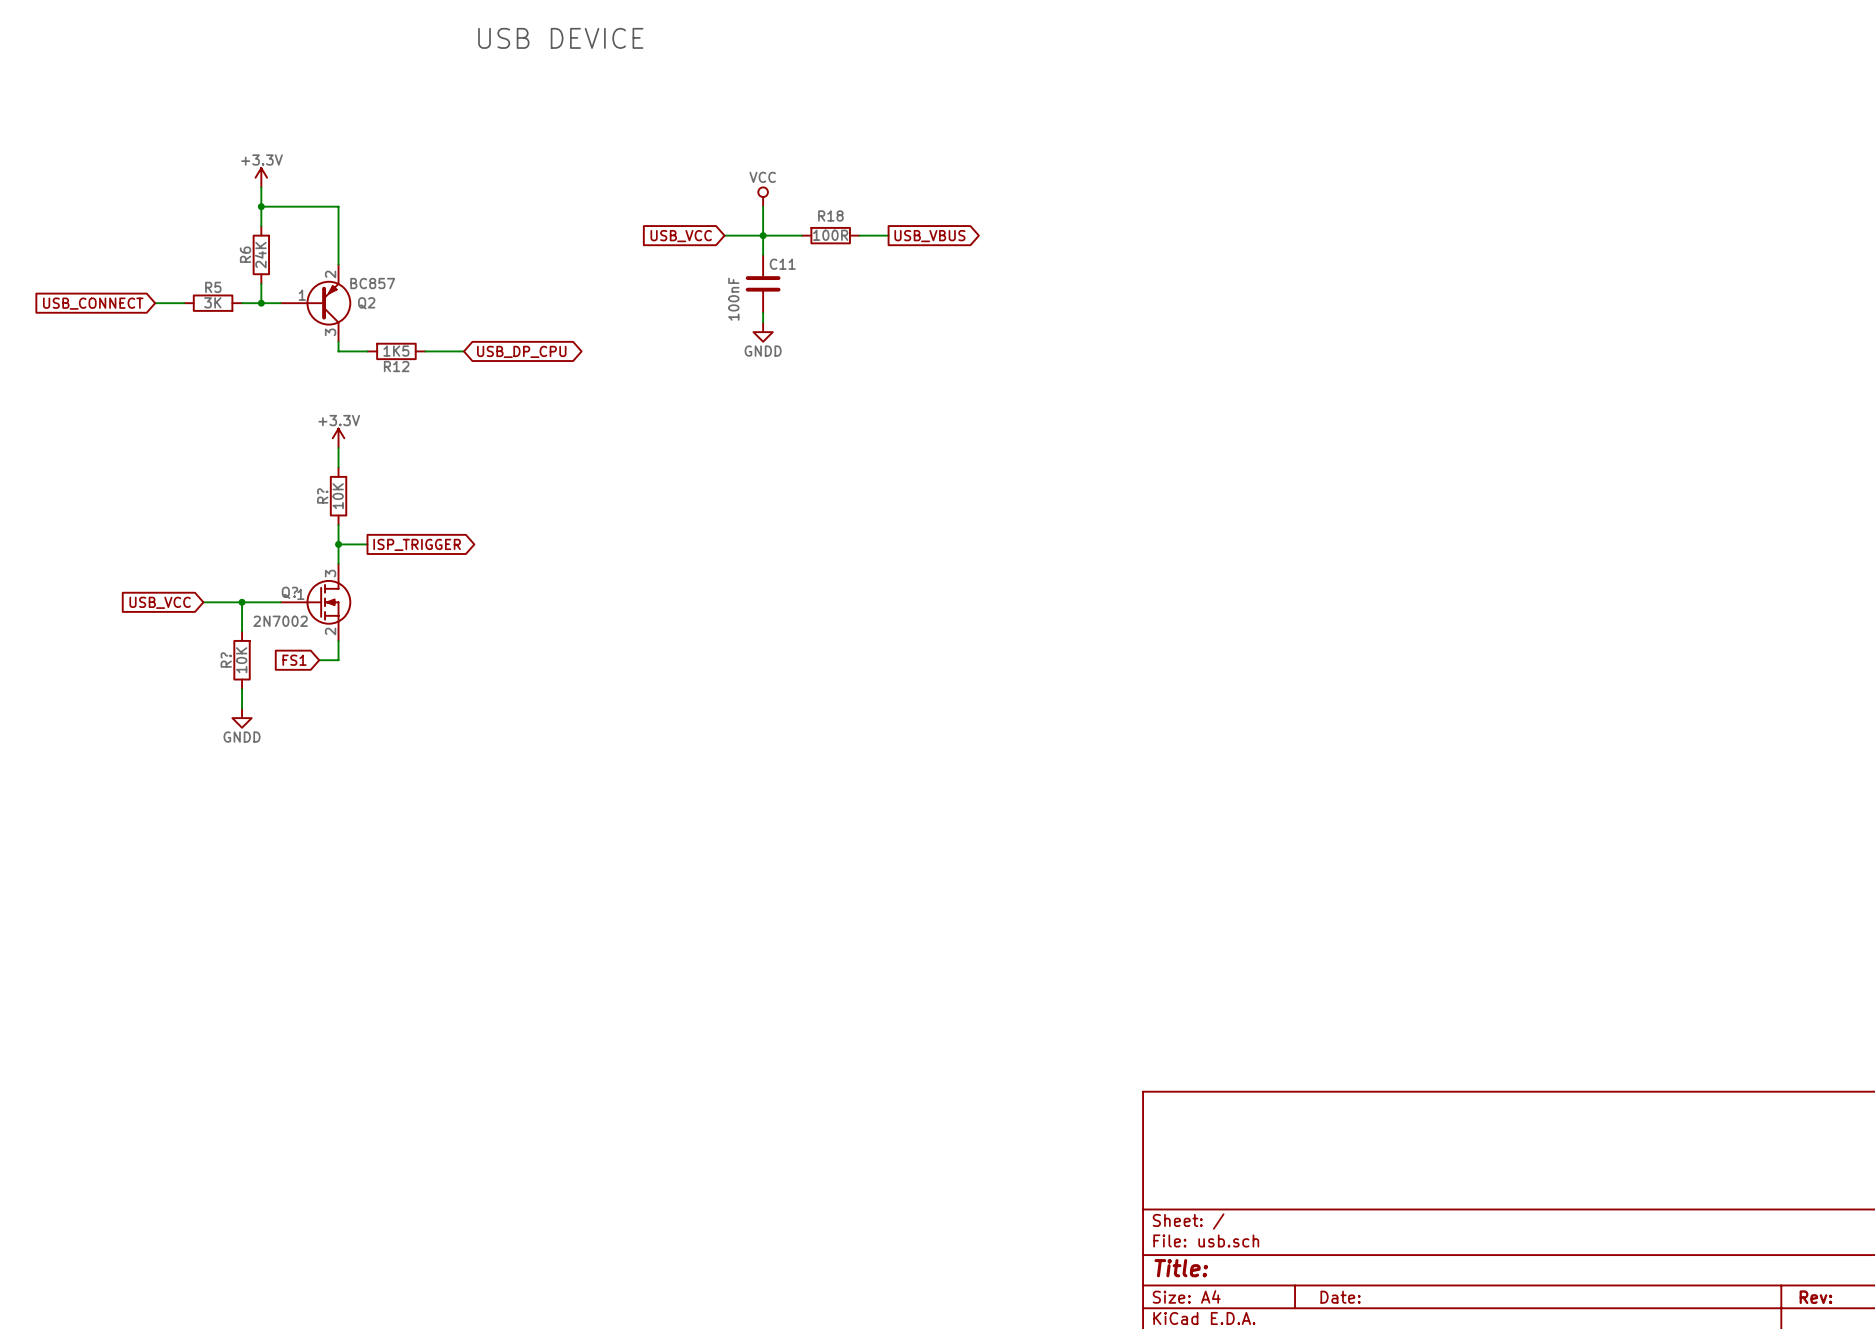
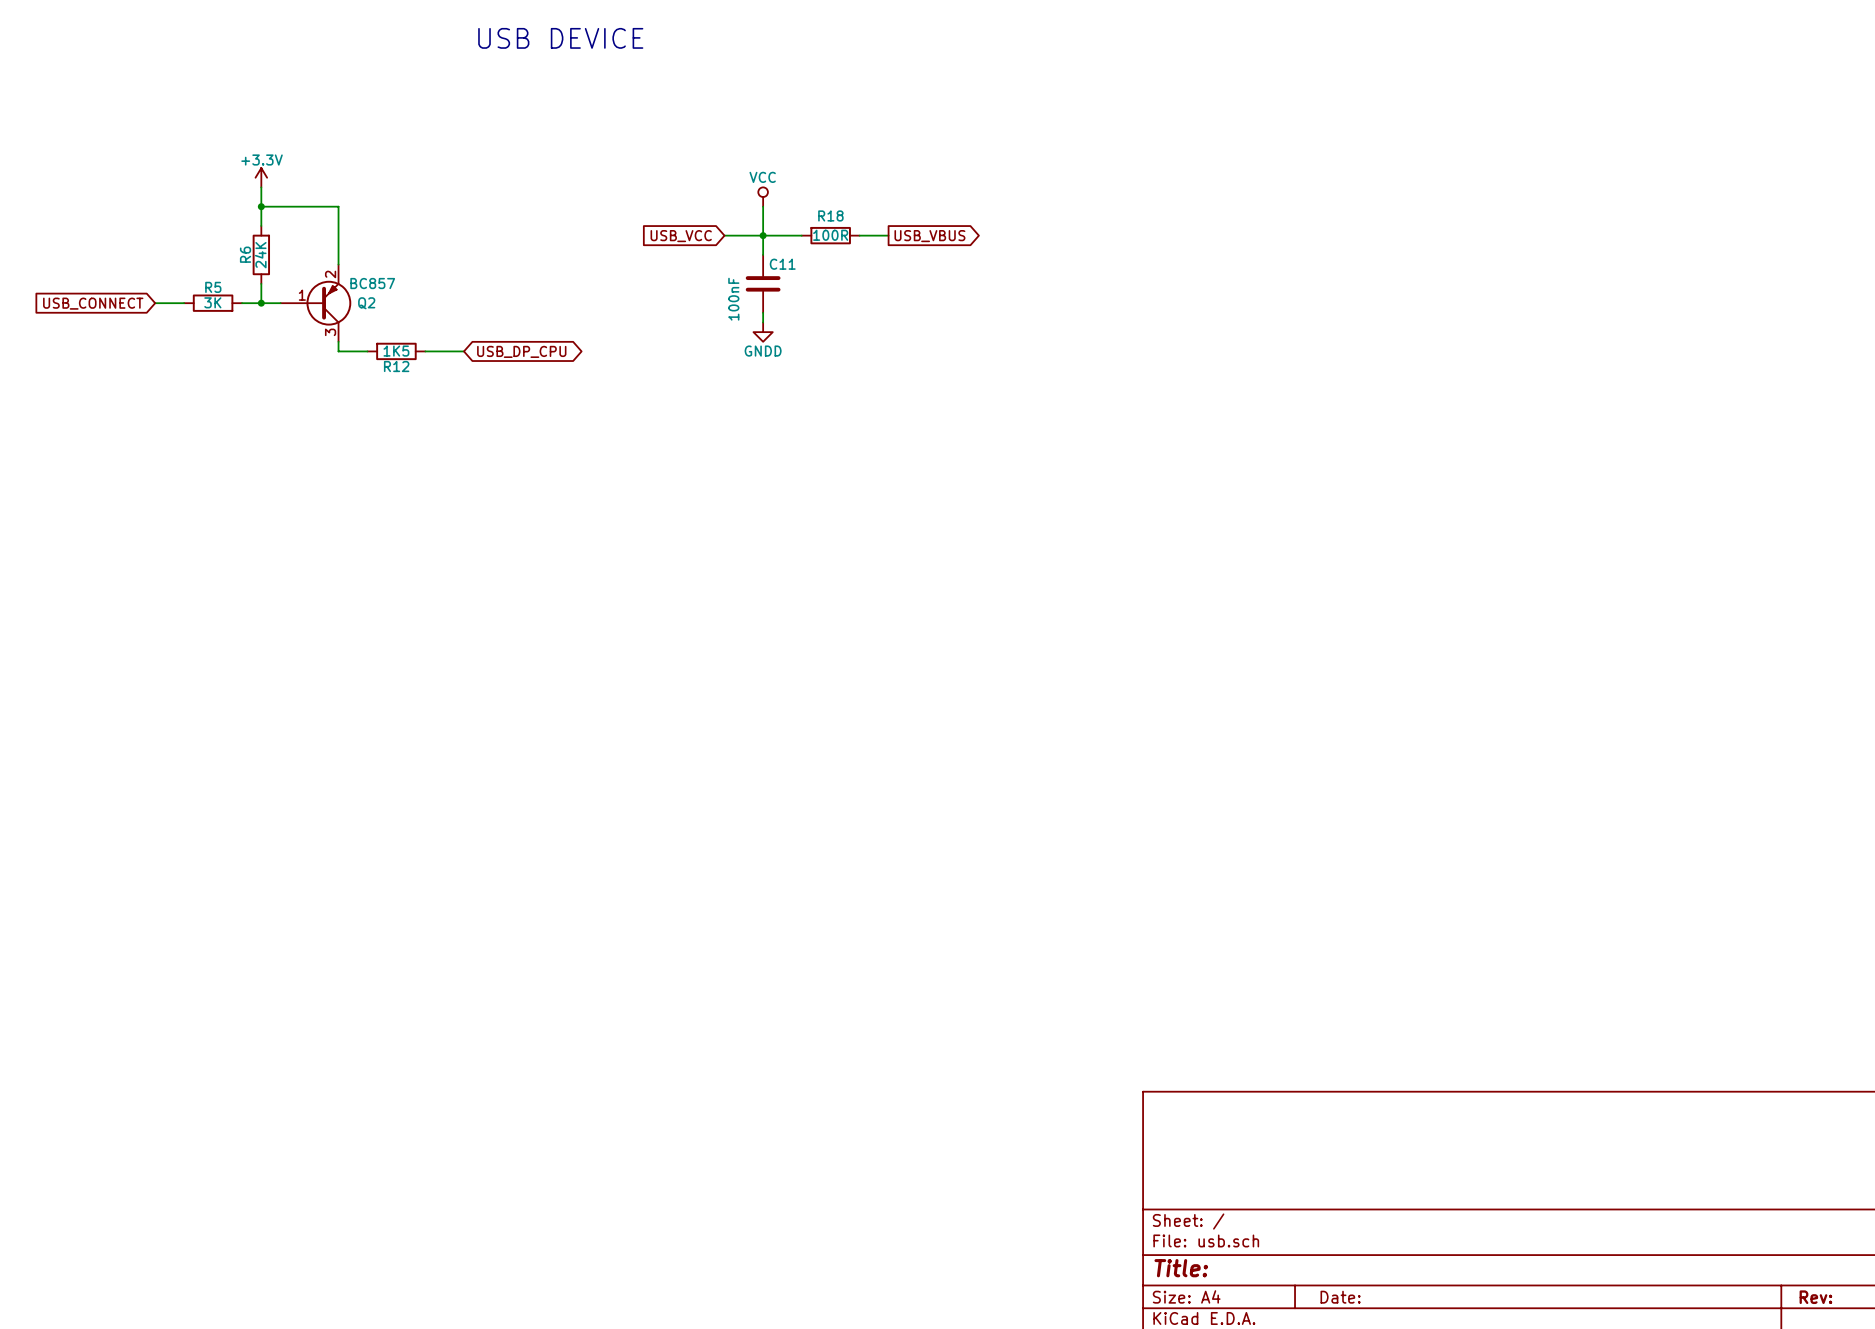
power symbol: +3.3V (338, 438) -> none
wire: (338, 447) (338, 467) -> none
R?: 10K (338, 496) -> none
wire: (338, 525) (338, 563) -> none
wire: (338, 544) (367, 544) -> none
junction: (338, 544) -> none
global label: ISP_TRIGGER (417, 544) -> none
global label: USB_VCC (160, 602) -> none
wire: (203, 602) (280, 602) -> none
wire: (242, 602) (242, 631) -> none
junction: (242, 602) -> none
Q?: 2N7002 (315, 602) -> none
wire: (338, 640) (338, 660) (319, 660) -> none
R?: 10K (242, 660) -> none
global label: FS1 (294, 660) -> none
wire: (242, 689) (242, 708) -> none
power symbol: GNDD (242, 718) -> none

